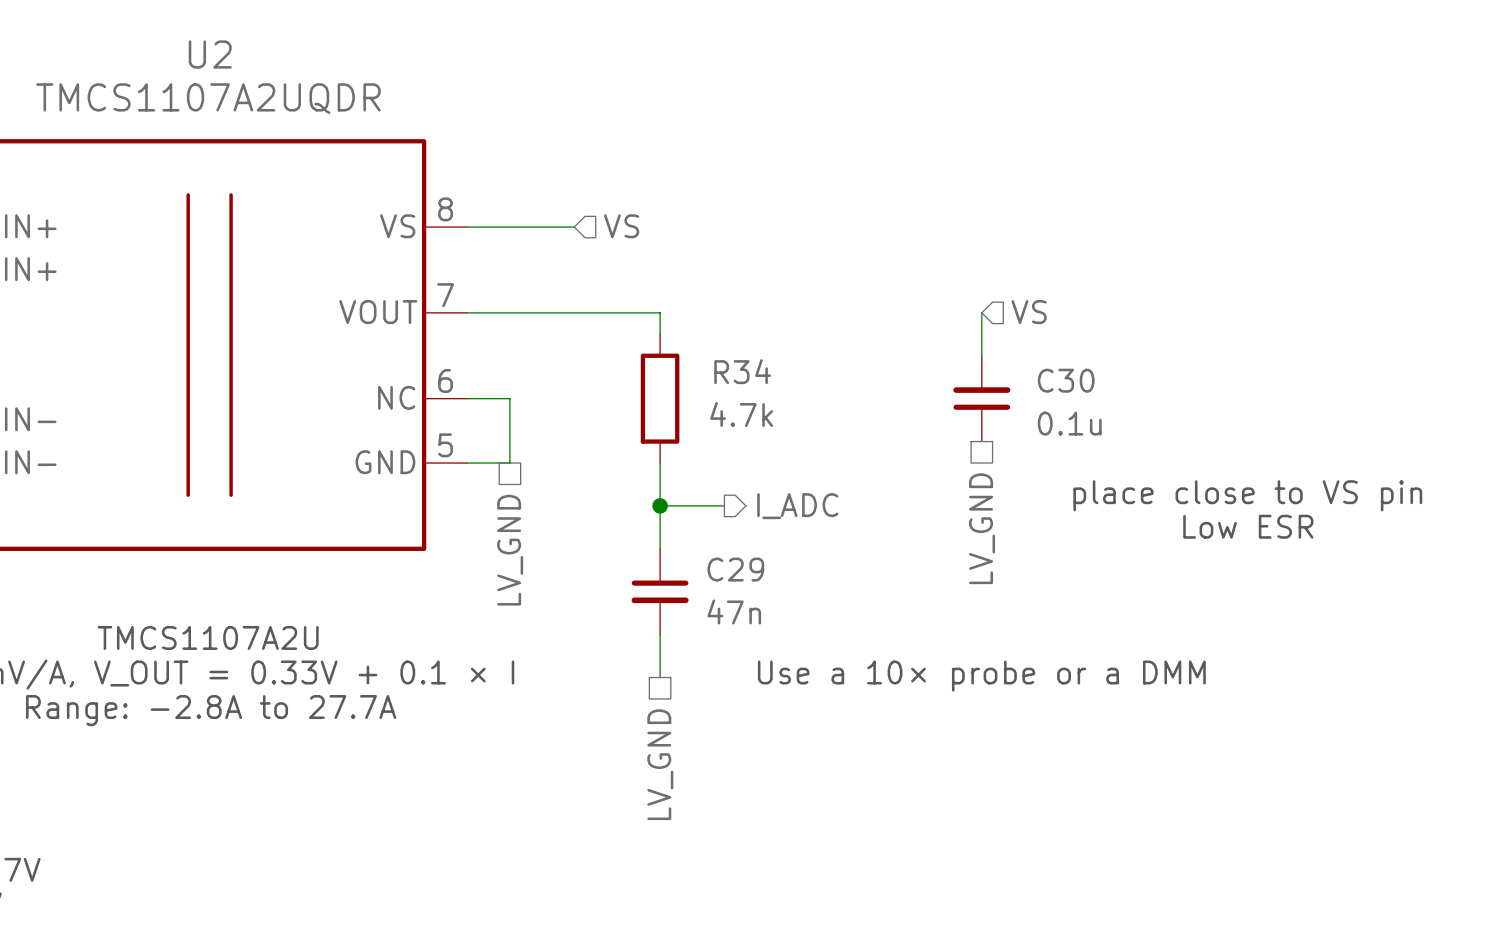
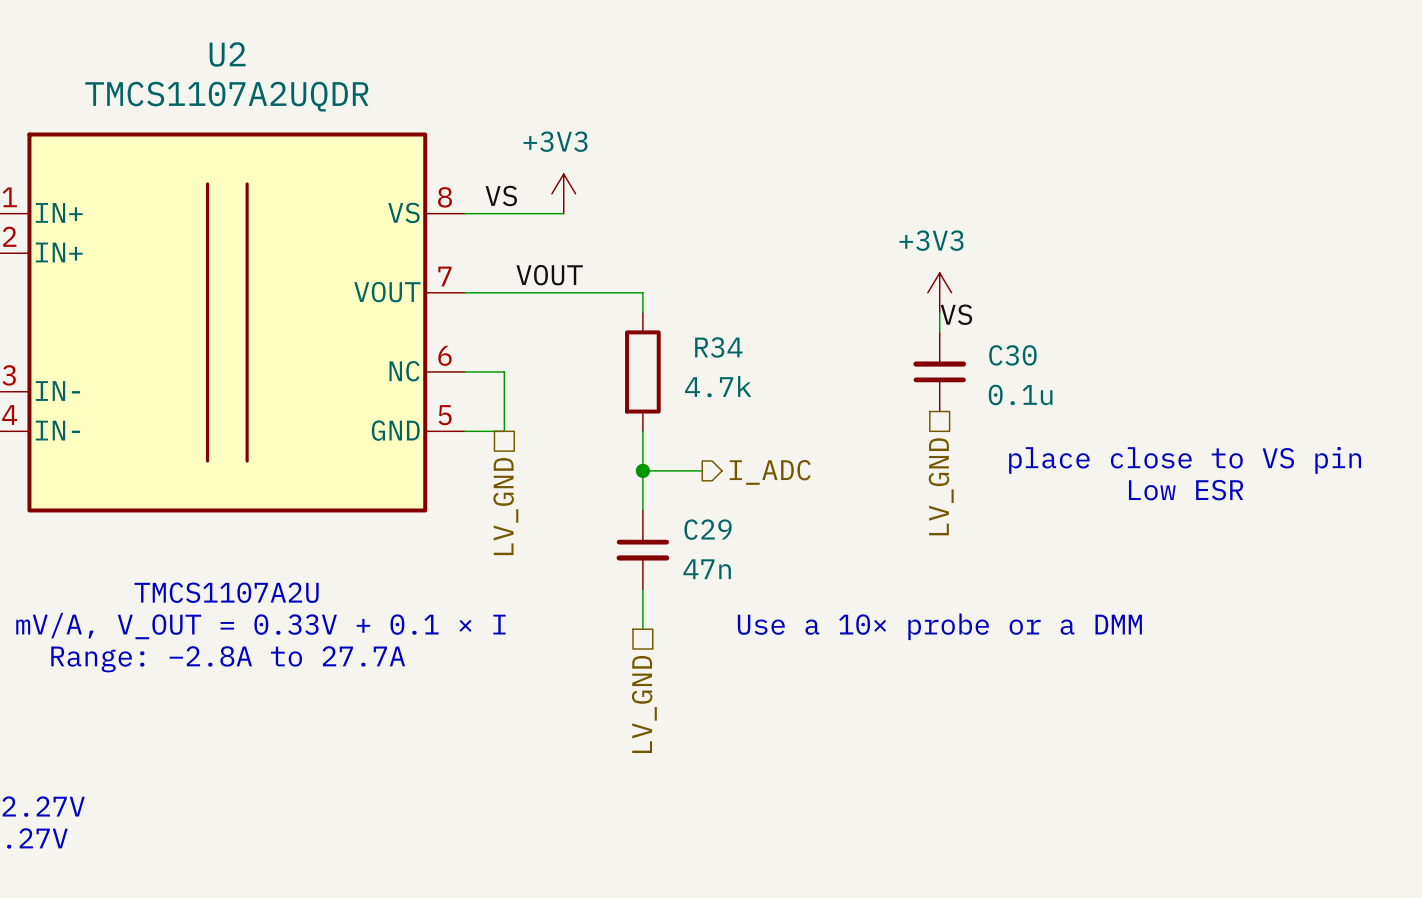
power symbol: none -> +3V3 (563, 193)
label: none -> VS (501, 196)
hierarchical label: VS (621, 226) -> none
label: none -> VOUT (549, 275)
power symbol: none -> +3V3 (939, 292)
hierarchical label: VS (1029, 312) -> none
label: none -> VS (956, 314)

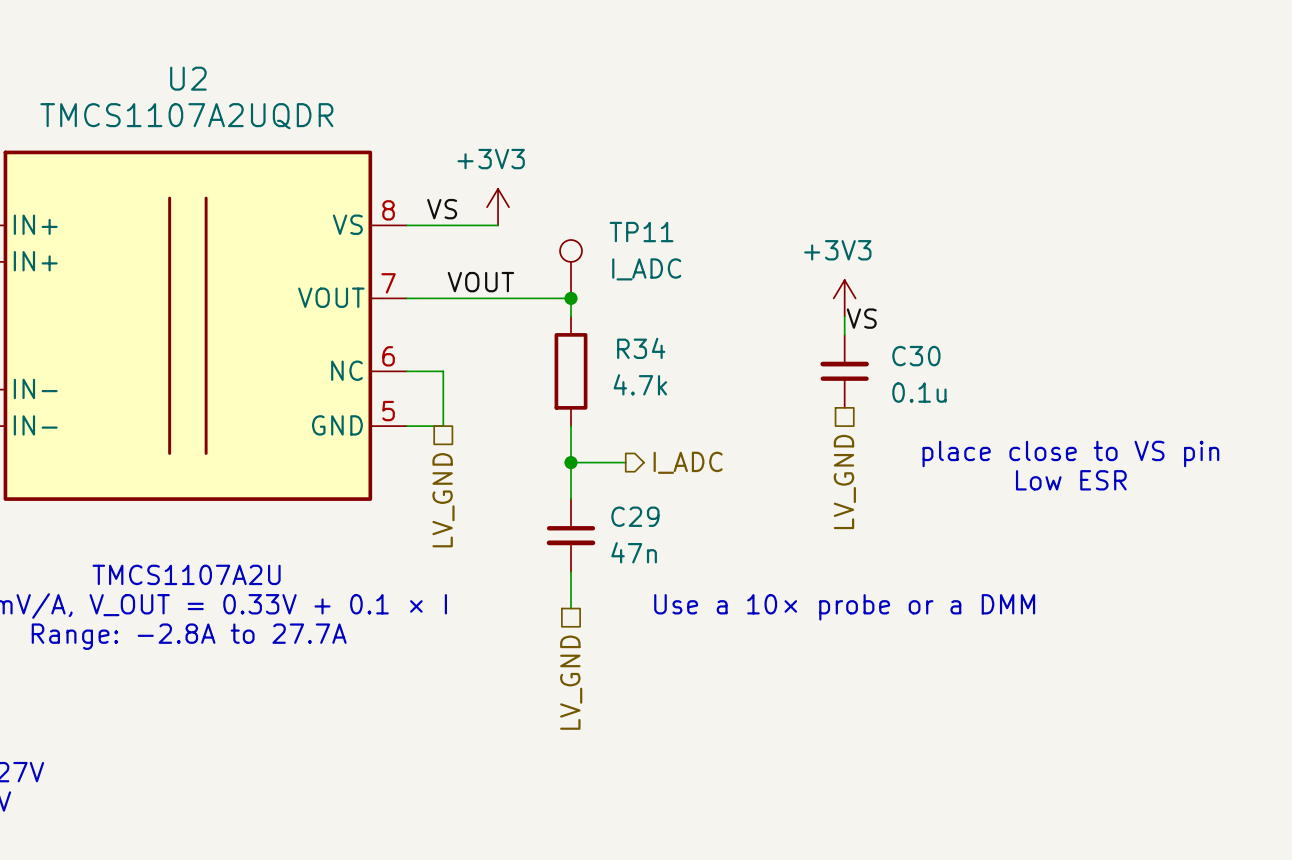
TP11: none -> I_ADC (571, 269)
junction: none -> (571, 298)

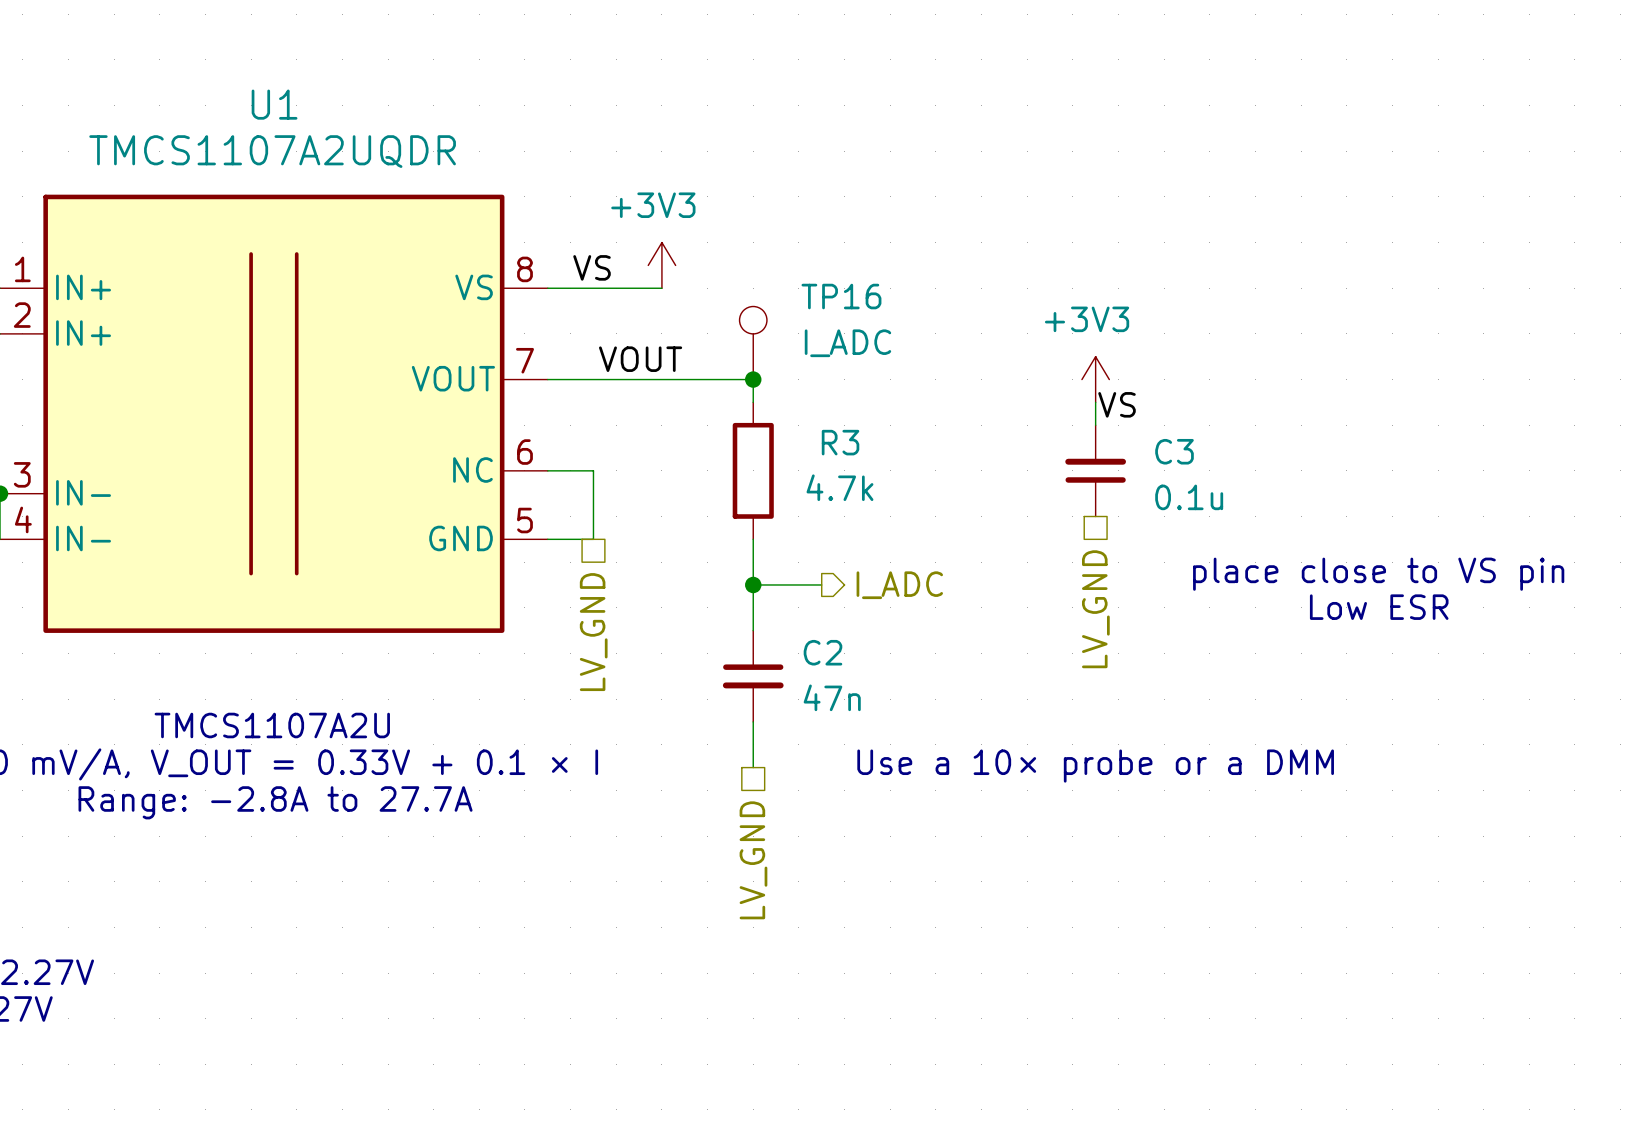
U2 name: U2 (188, 78) -> U1 (274, 104)
TP11 name: TP11 (641, 232) -> TP16 (841, 296)
R34 name: R34 (641, 348) -> R3 (840, 442)
C30 name: C30 (916, 356) -> C3 (1174, 451)
C29 name: C29 (635, 516) -> C2 (822, 652)

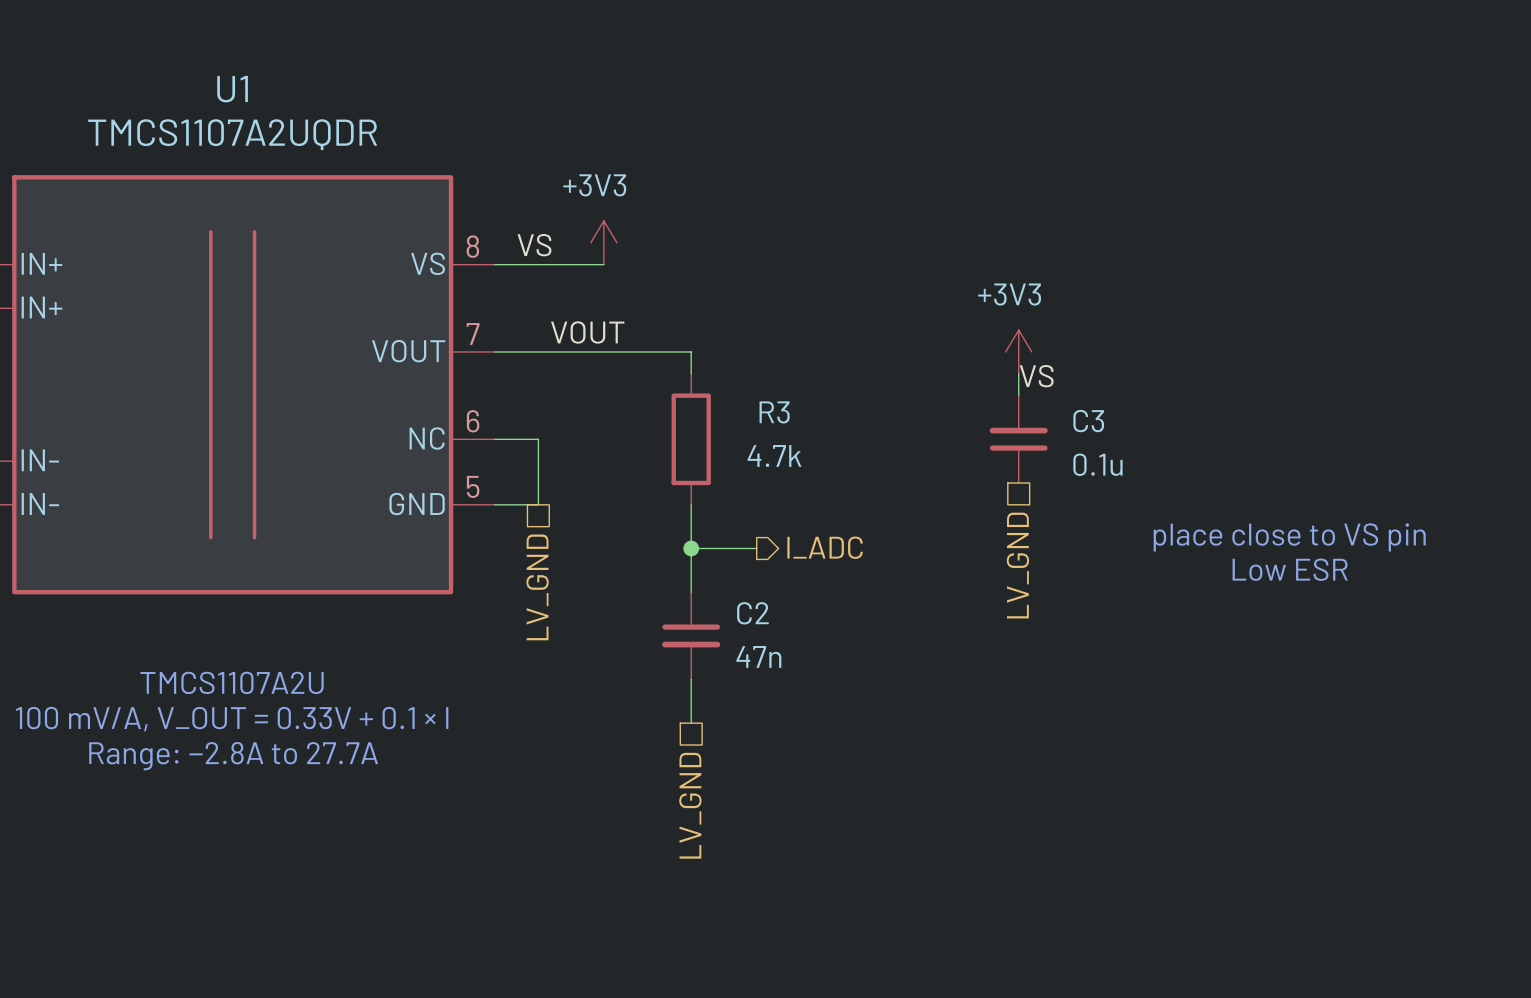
TP16: I_ADC (753, 343) -> none
junction: (753, 379) -> none
text: Use a 10× probe or a DMM (1095, 766) -> none

